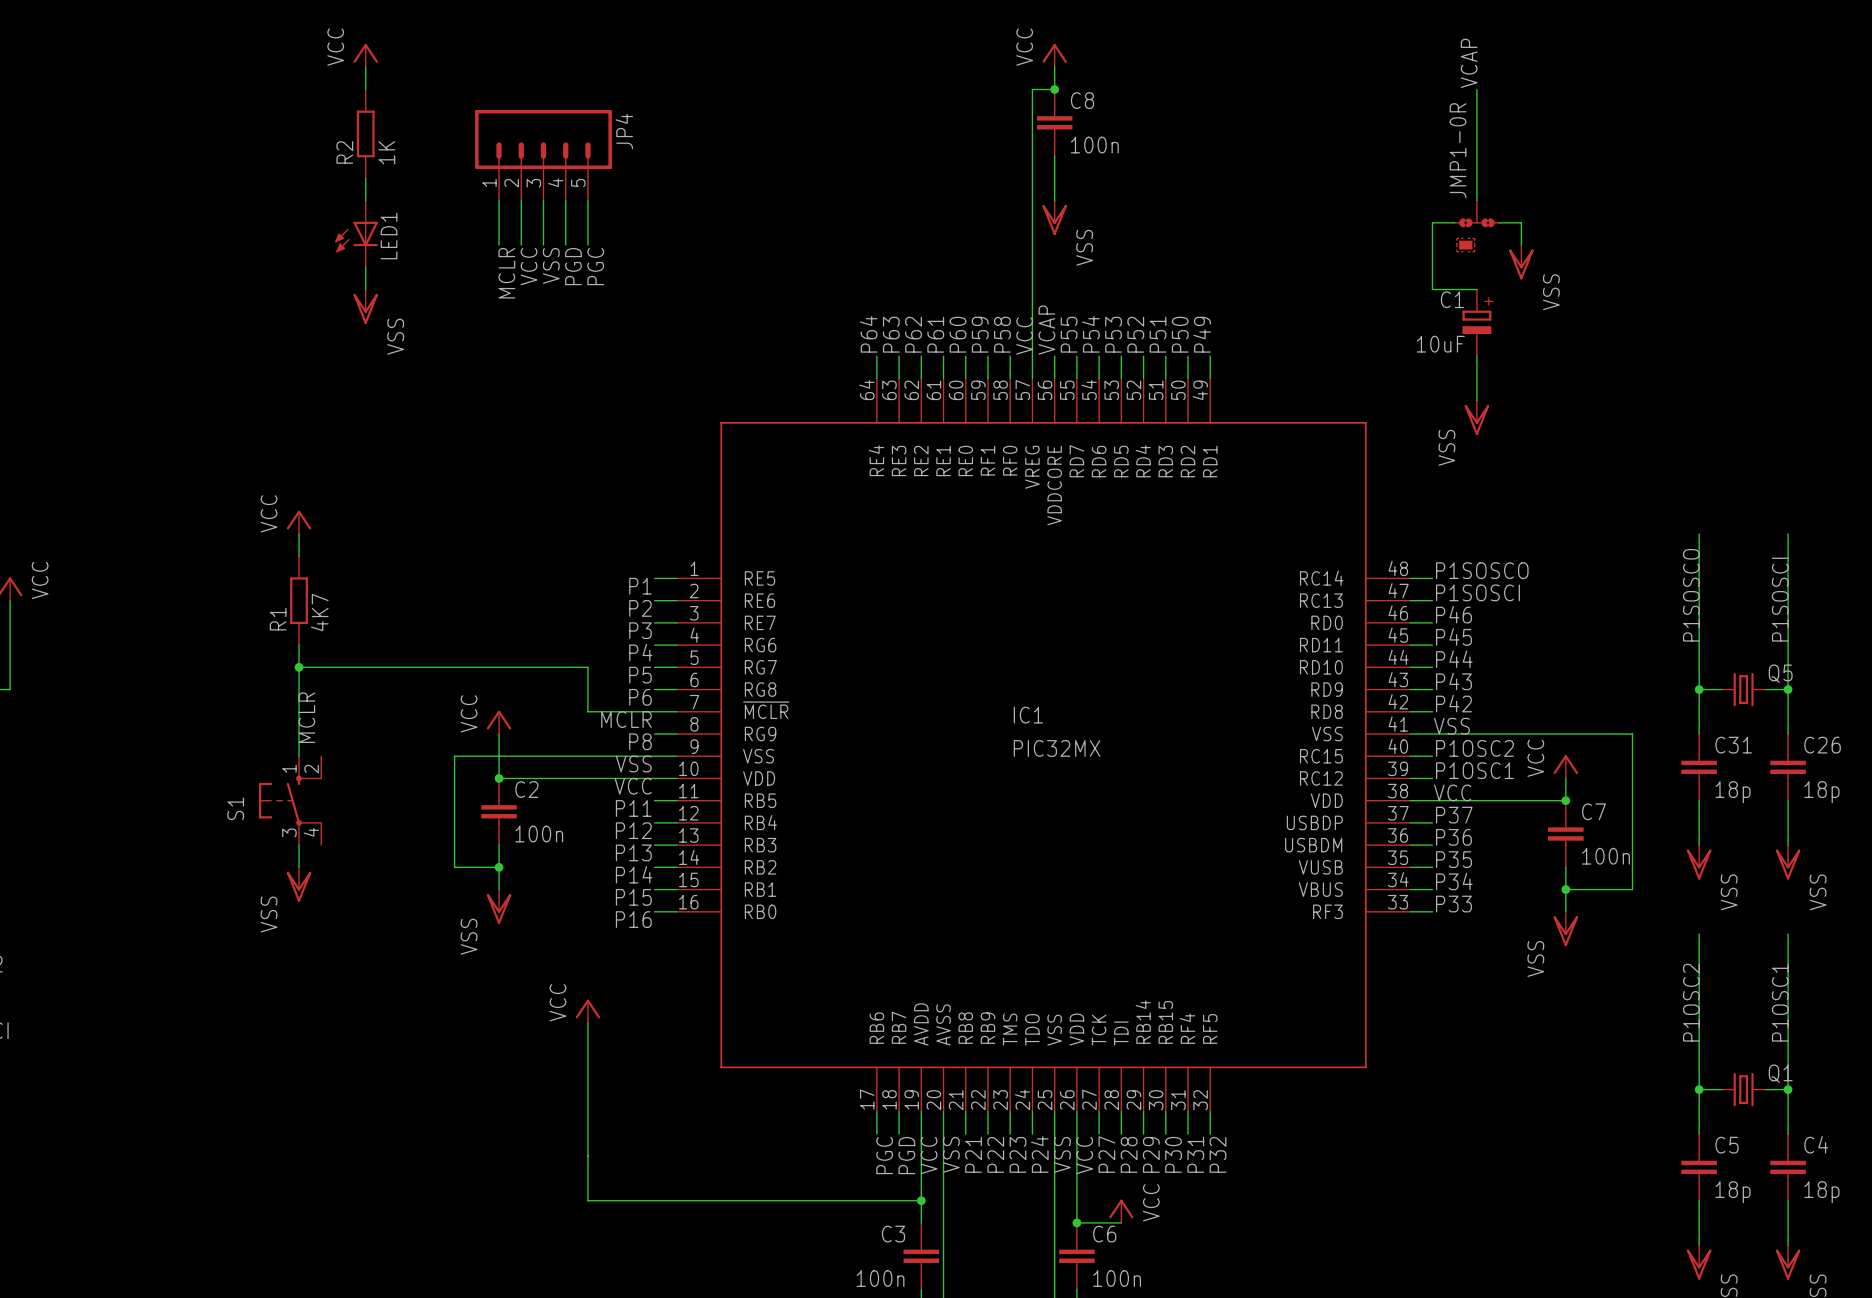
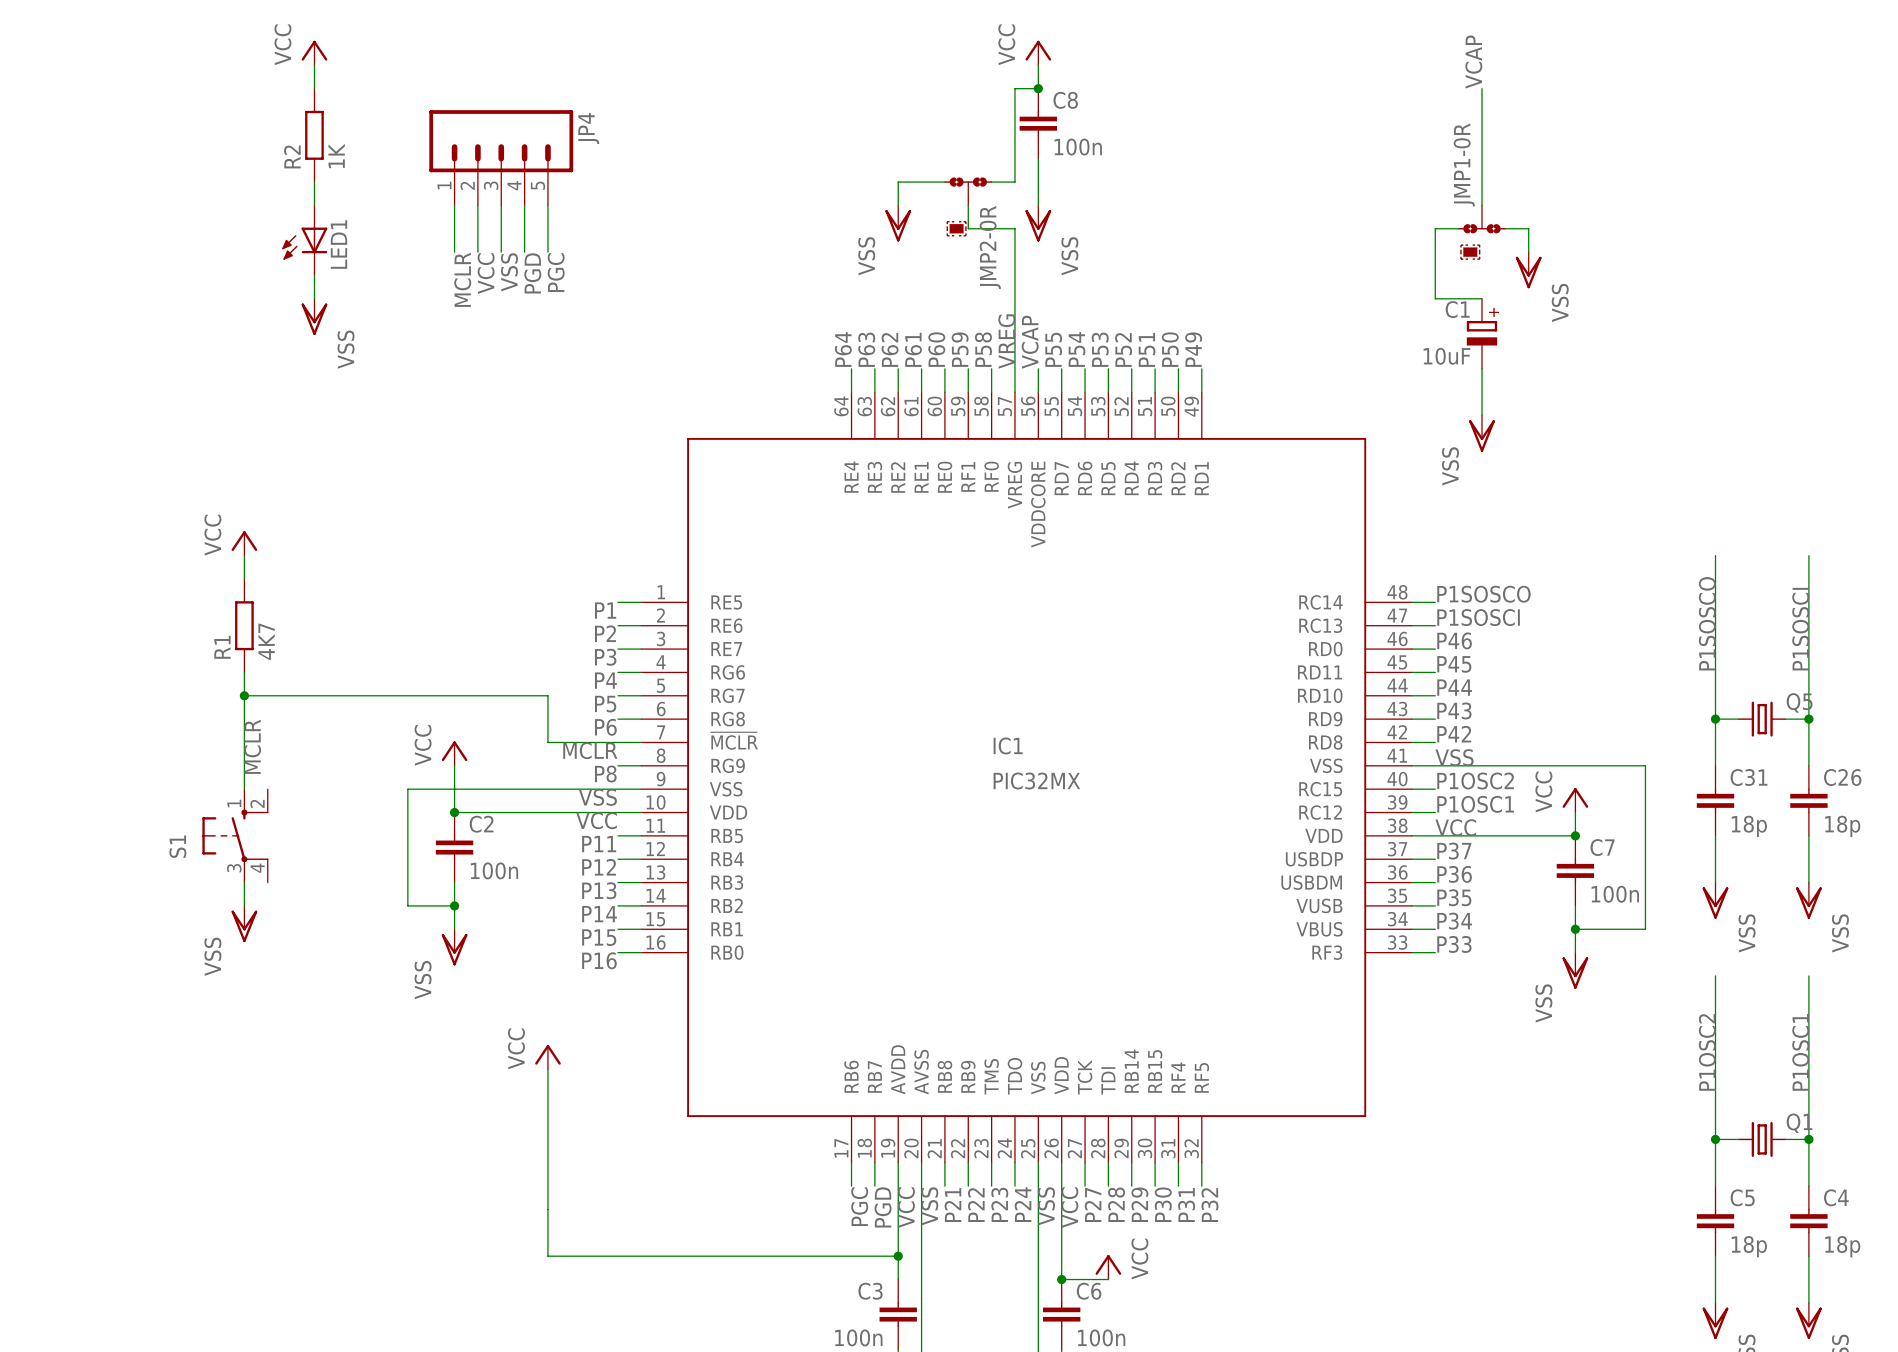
wire: none -> (944, 182) (898, 182) (898, 205)
wire: none -> (991, 182) (1014, 182)
wire: (1032, 178) (1032, 222) -> (968, 205) (968, 228) (1014, 228)
JMP2-0R: none -> (968, 191)
power symbol: none -> VSS (898, 223)
part: none -> (956, 228)
label: VCC (1024, 336) -> VREG (1006, 341)

